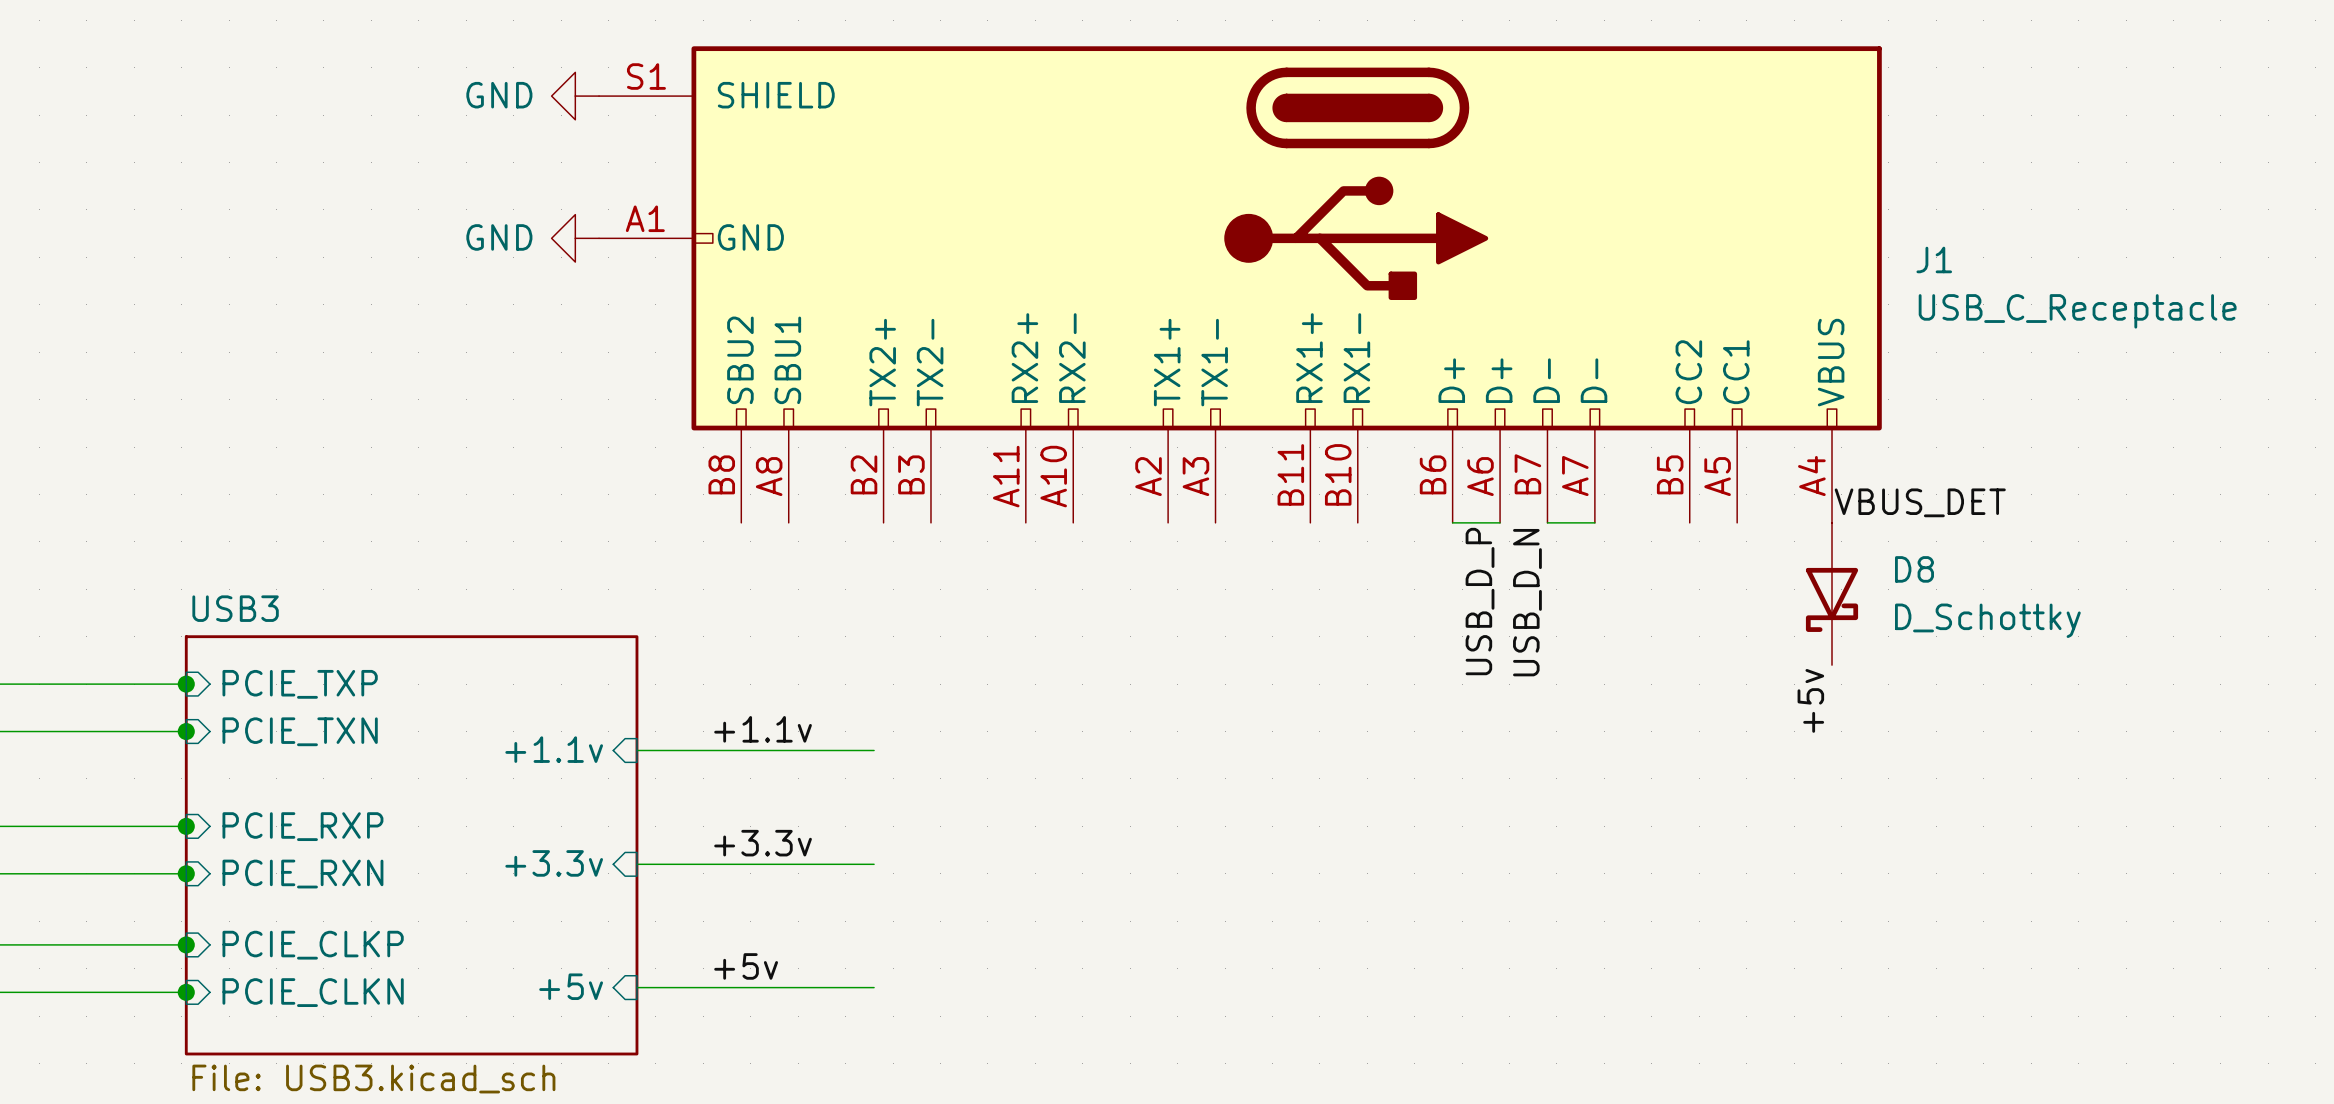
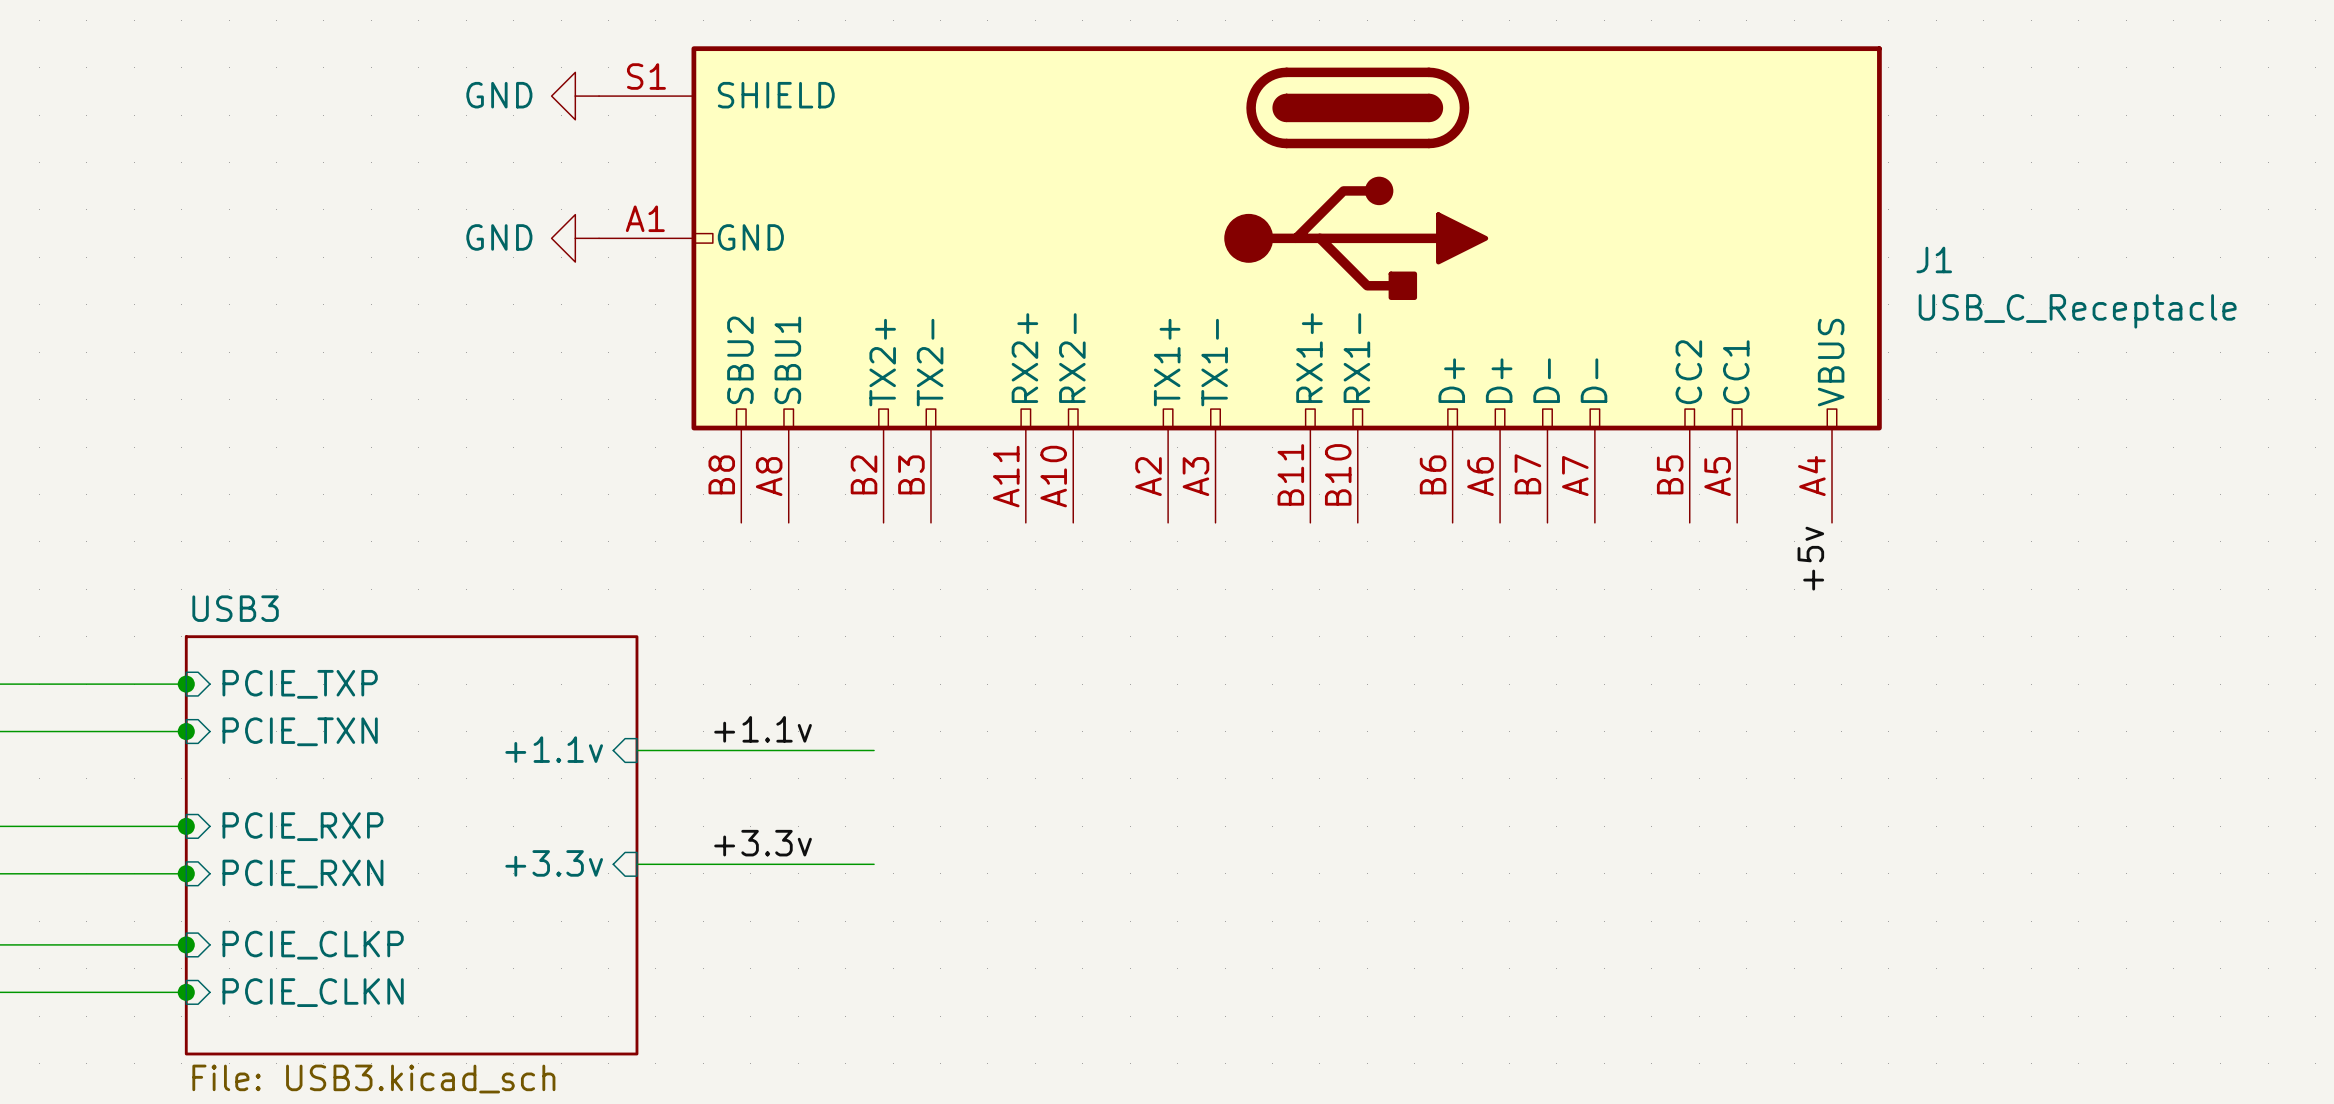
label: VBUS_DET (1920, 502) -> +5v (1810, 558)
wire: (1452, 522) (1500, 522) -> none
wire: (1547, 522) (1594, 522) -> none
D8: D_Schottky (1832, 594) -> none
label: USB_D_P (1480, 601) -> none
label: USB_D_N (1527, 602) -> none
label: +5v (1810, 700) -> none
label: +5v (746, 966) -> none
sheet pin: +5v (571, 986) -> none
wire: (636, 987) (874, 987) -> none

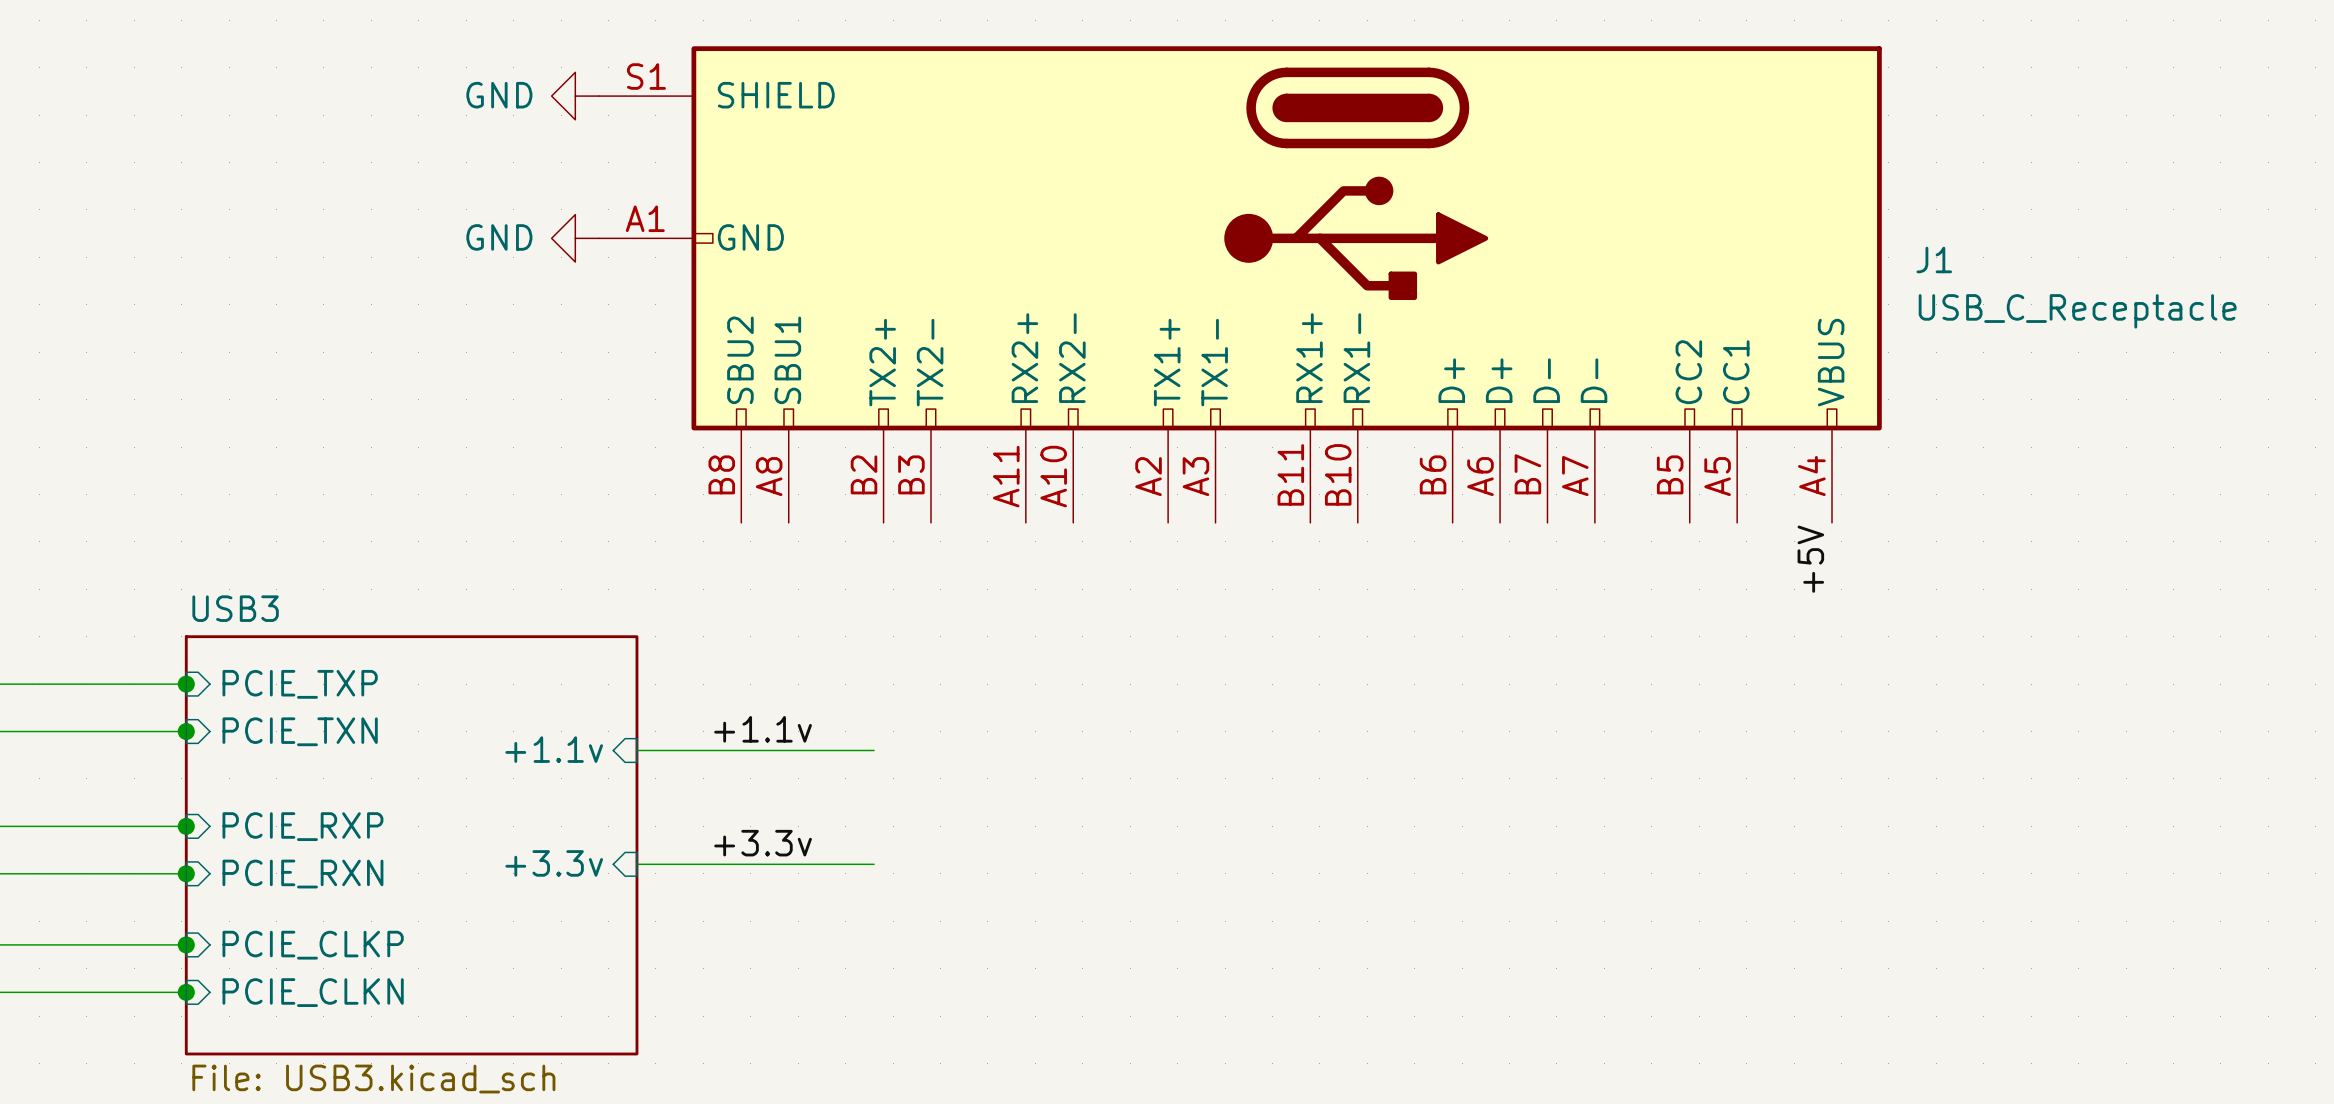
label: +5v (1810, 558) -> +5V (1810, 559)

